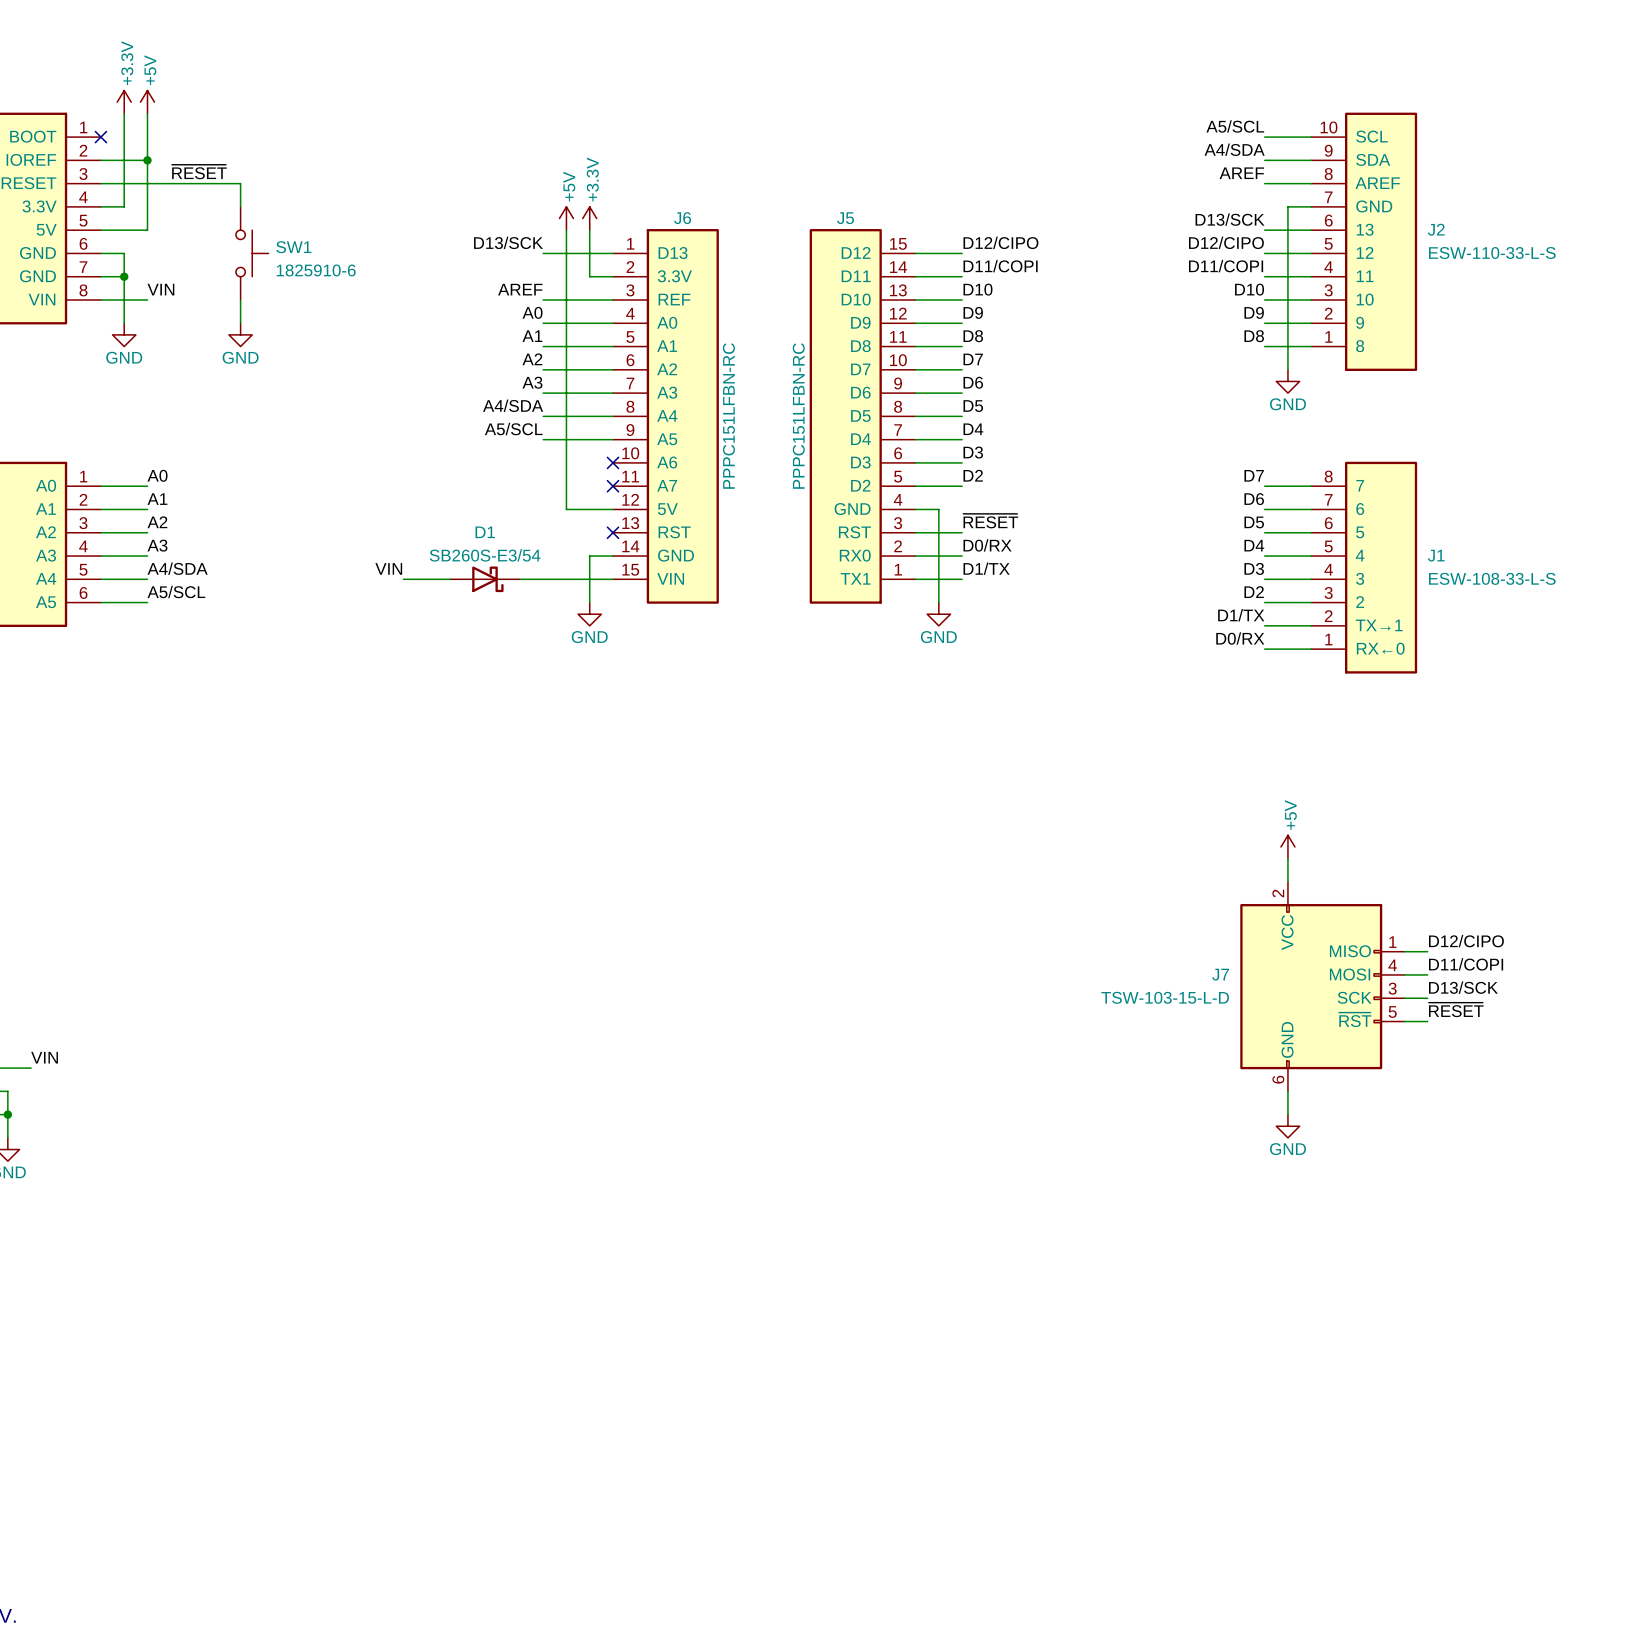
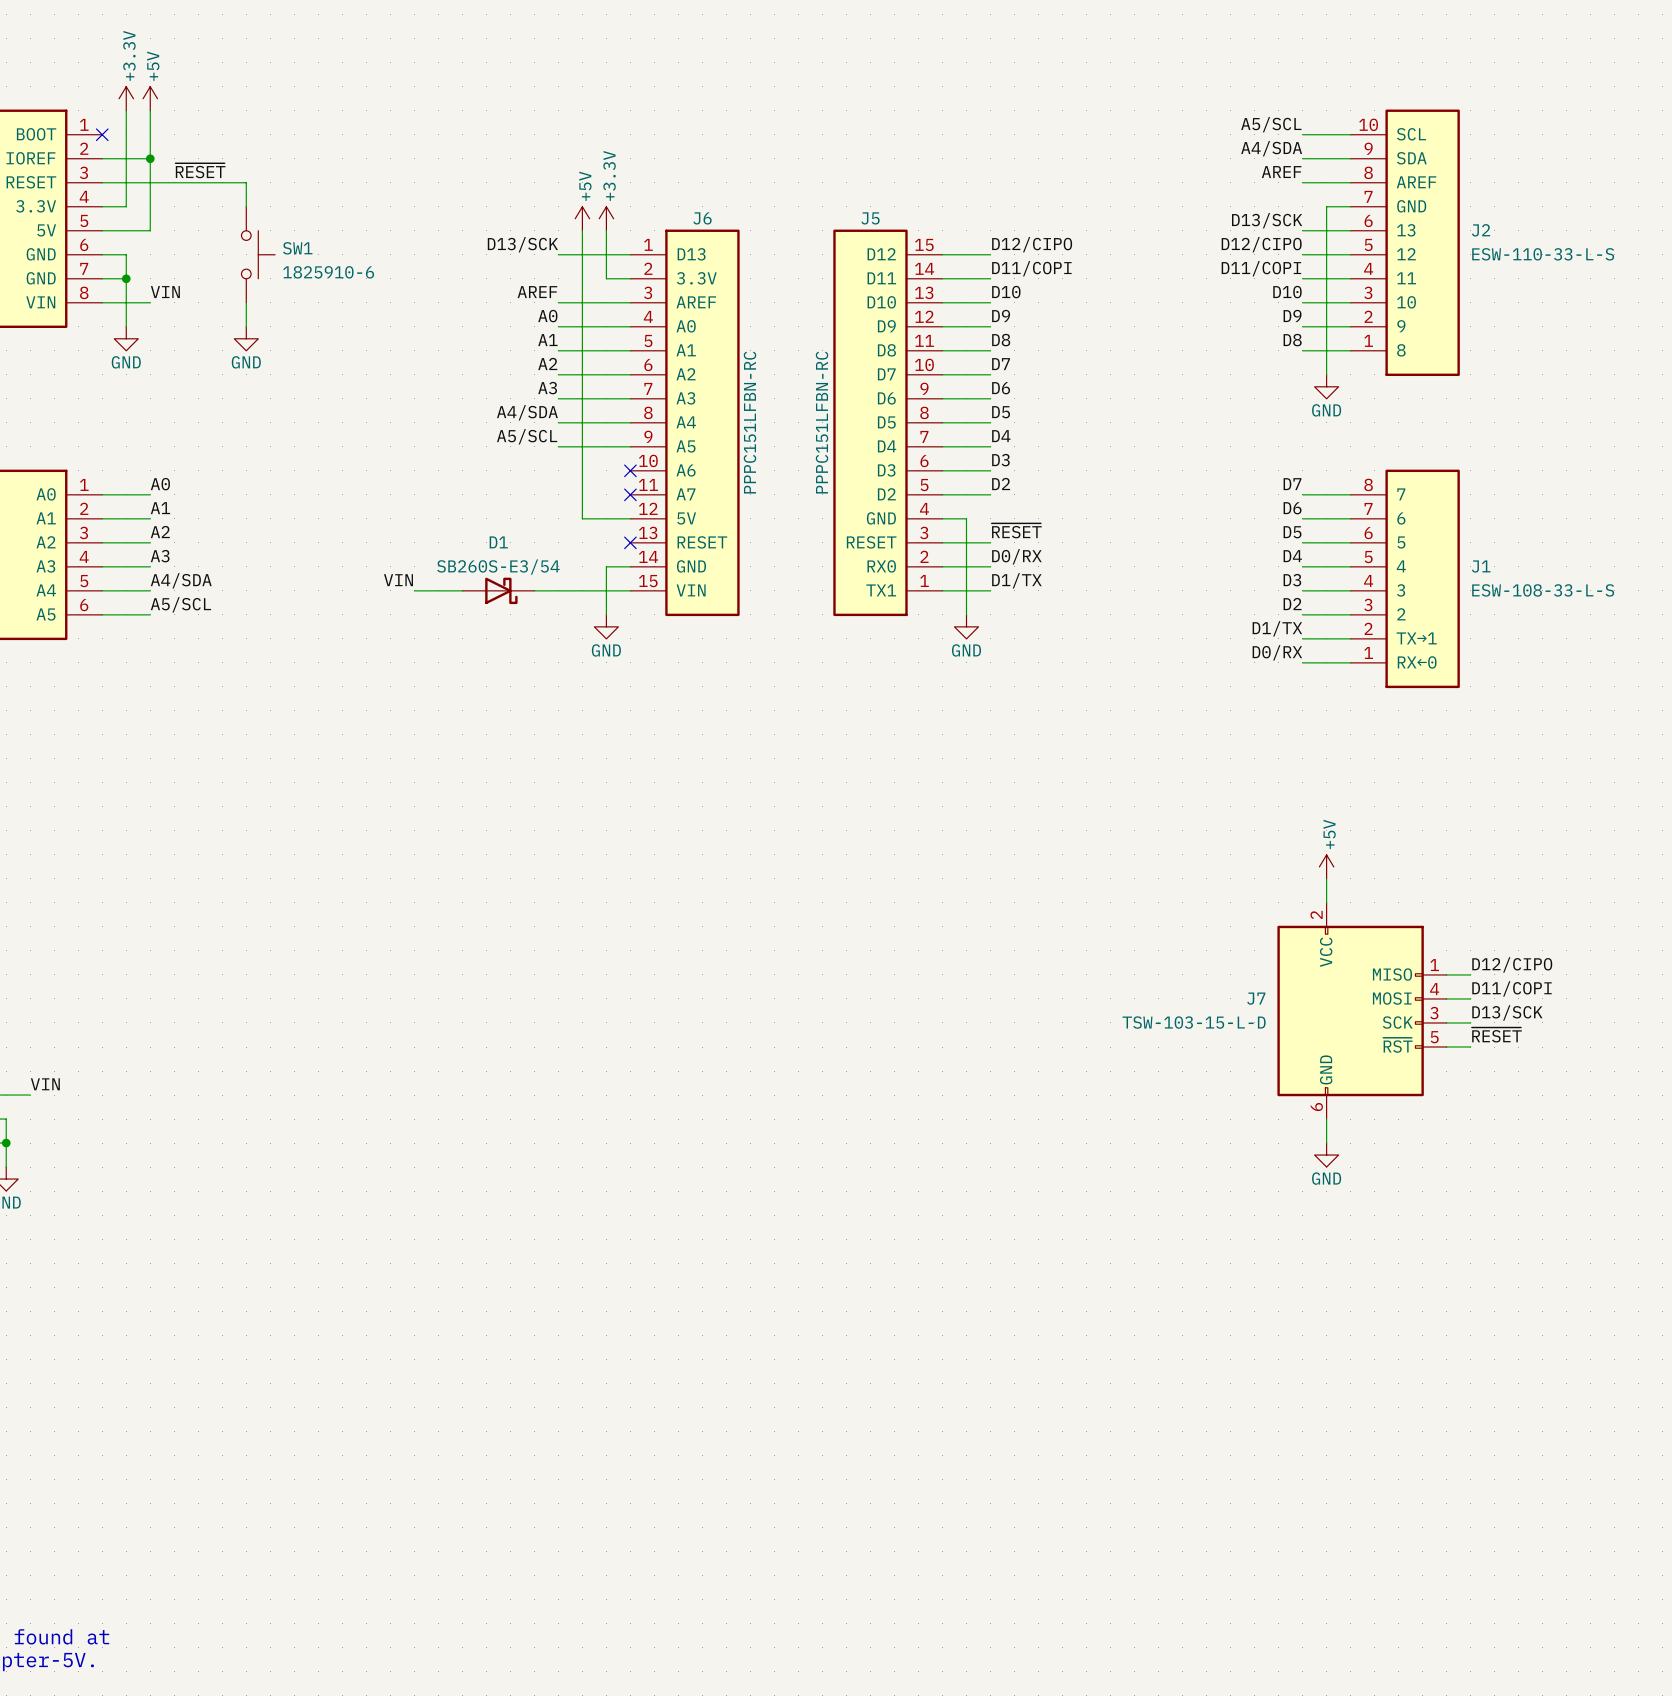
J6 pin name: REF (674, 299) -> AREF (696, 302)
J6 pin name: RST (674, 532) -> RESET (702, 542)
J5 pin name: RST (854, 532) -> RESET (871, 542)

